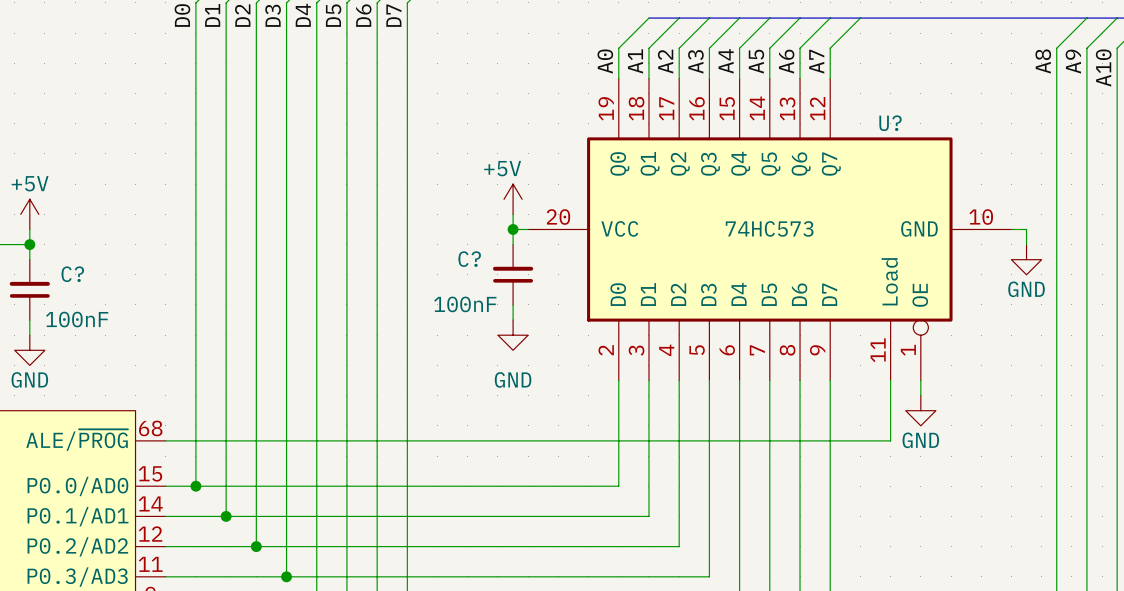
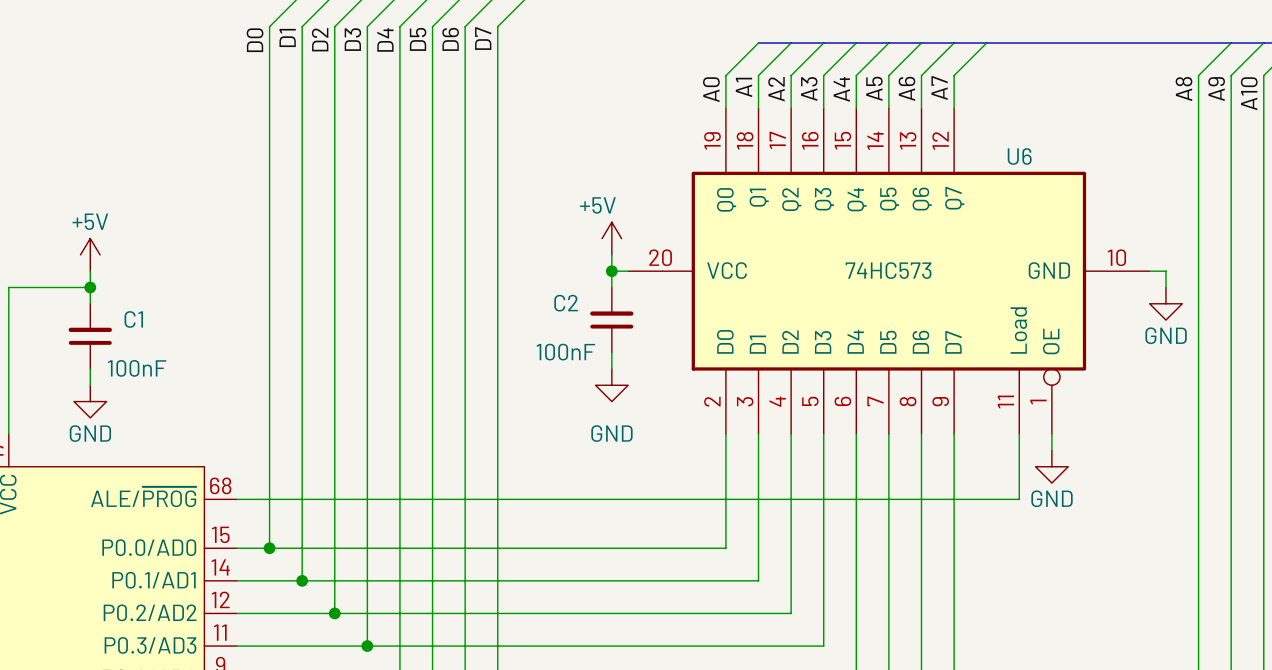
U? name: U? (890, 123) -> U6 (1019, 156)
C? name: C? (469, 259) -> C2 (566, 303)
C? name: C? (72, 274) -> C1 (133, 319)

